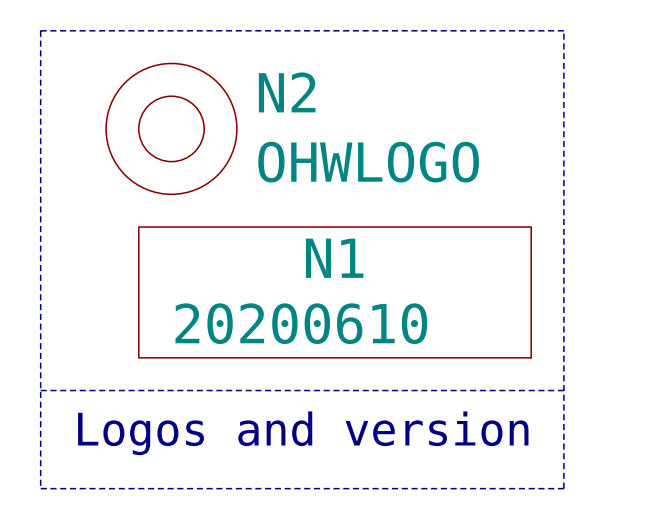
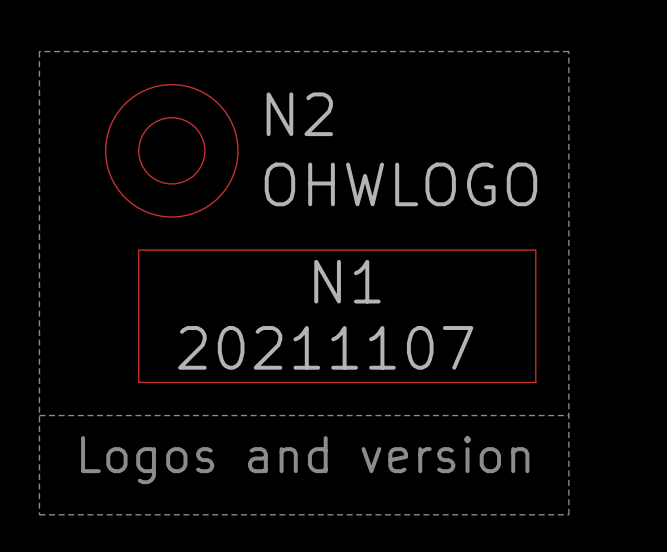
N1 value: 20200610 (301, 323) -> 20211107 (325, 347)

